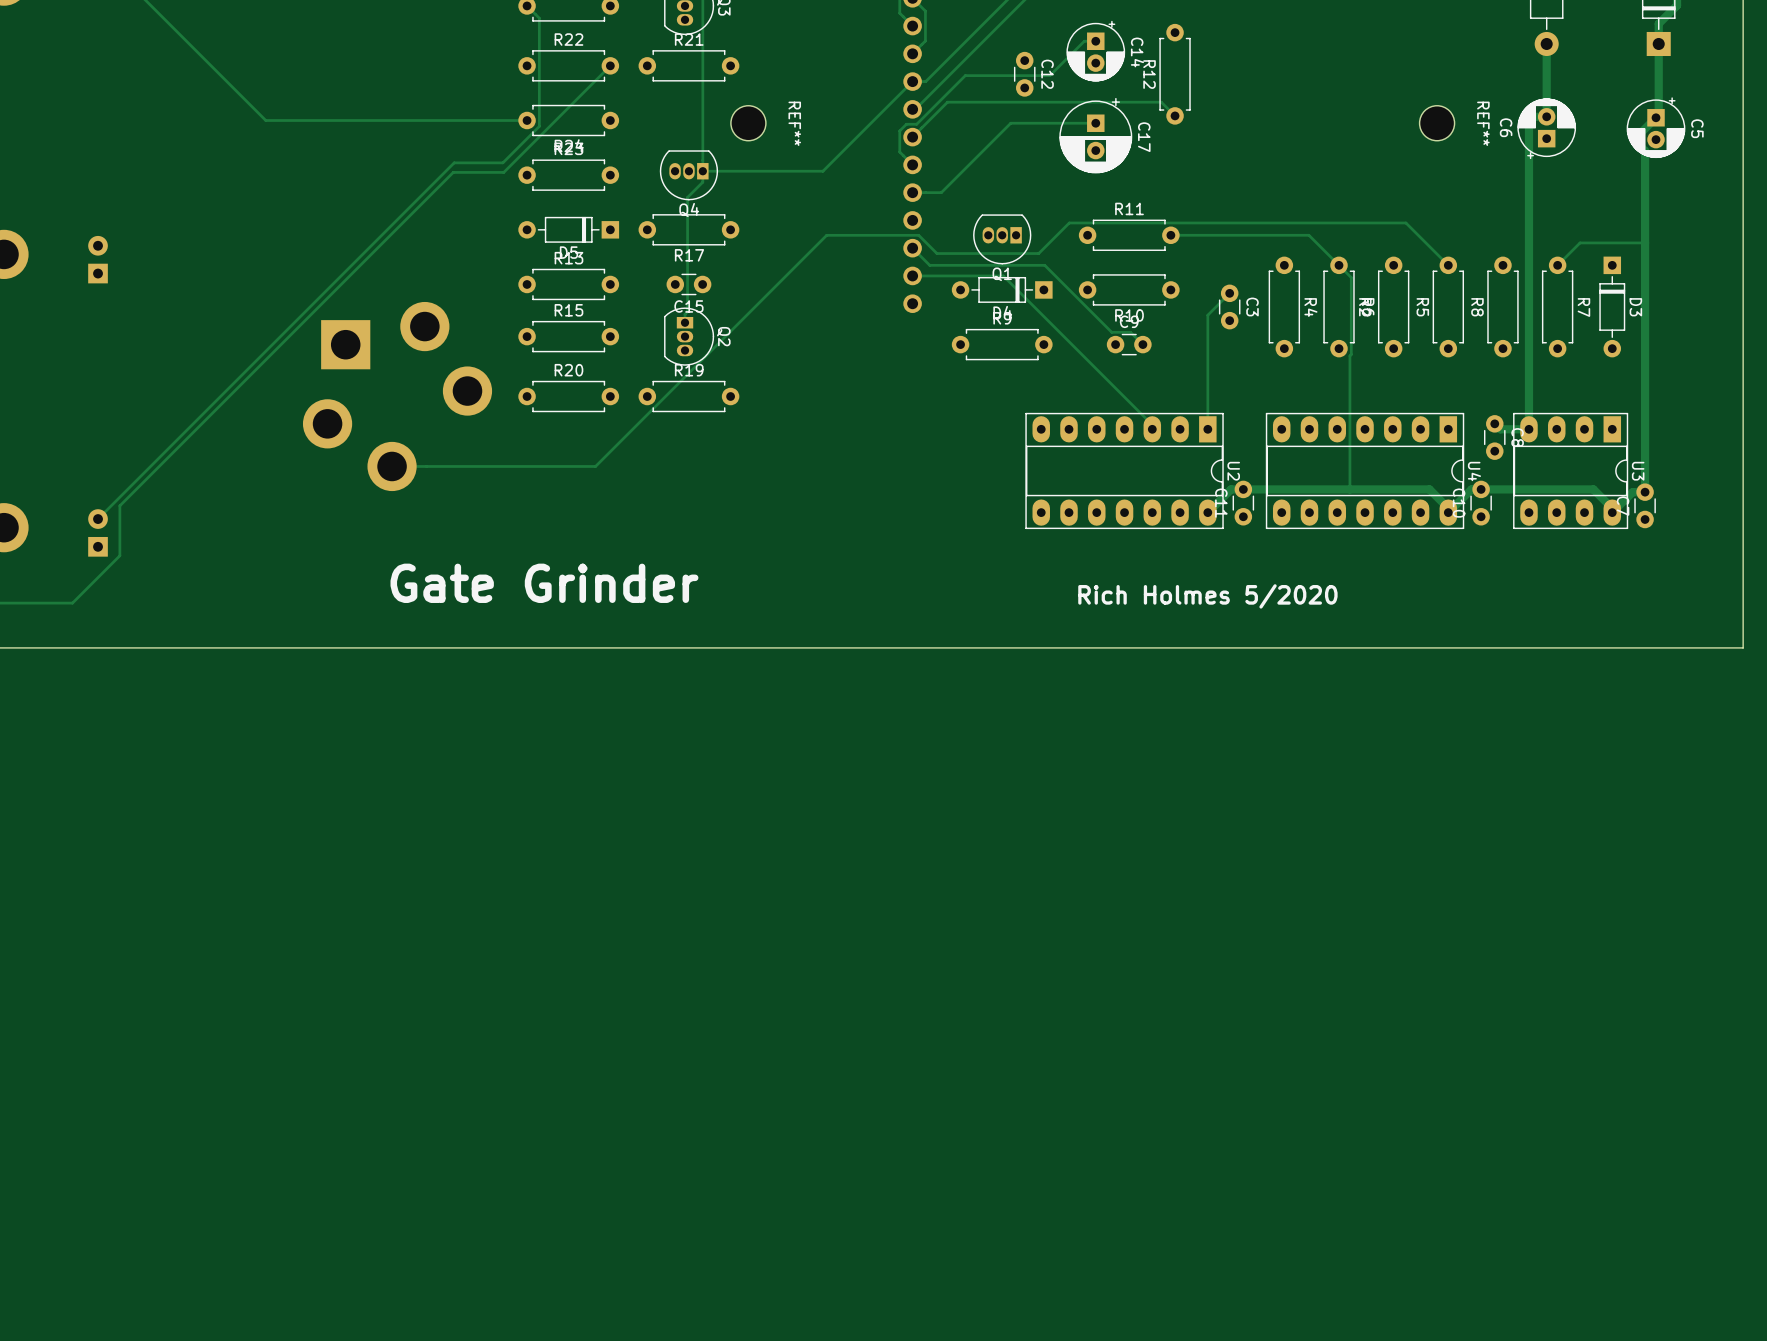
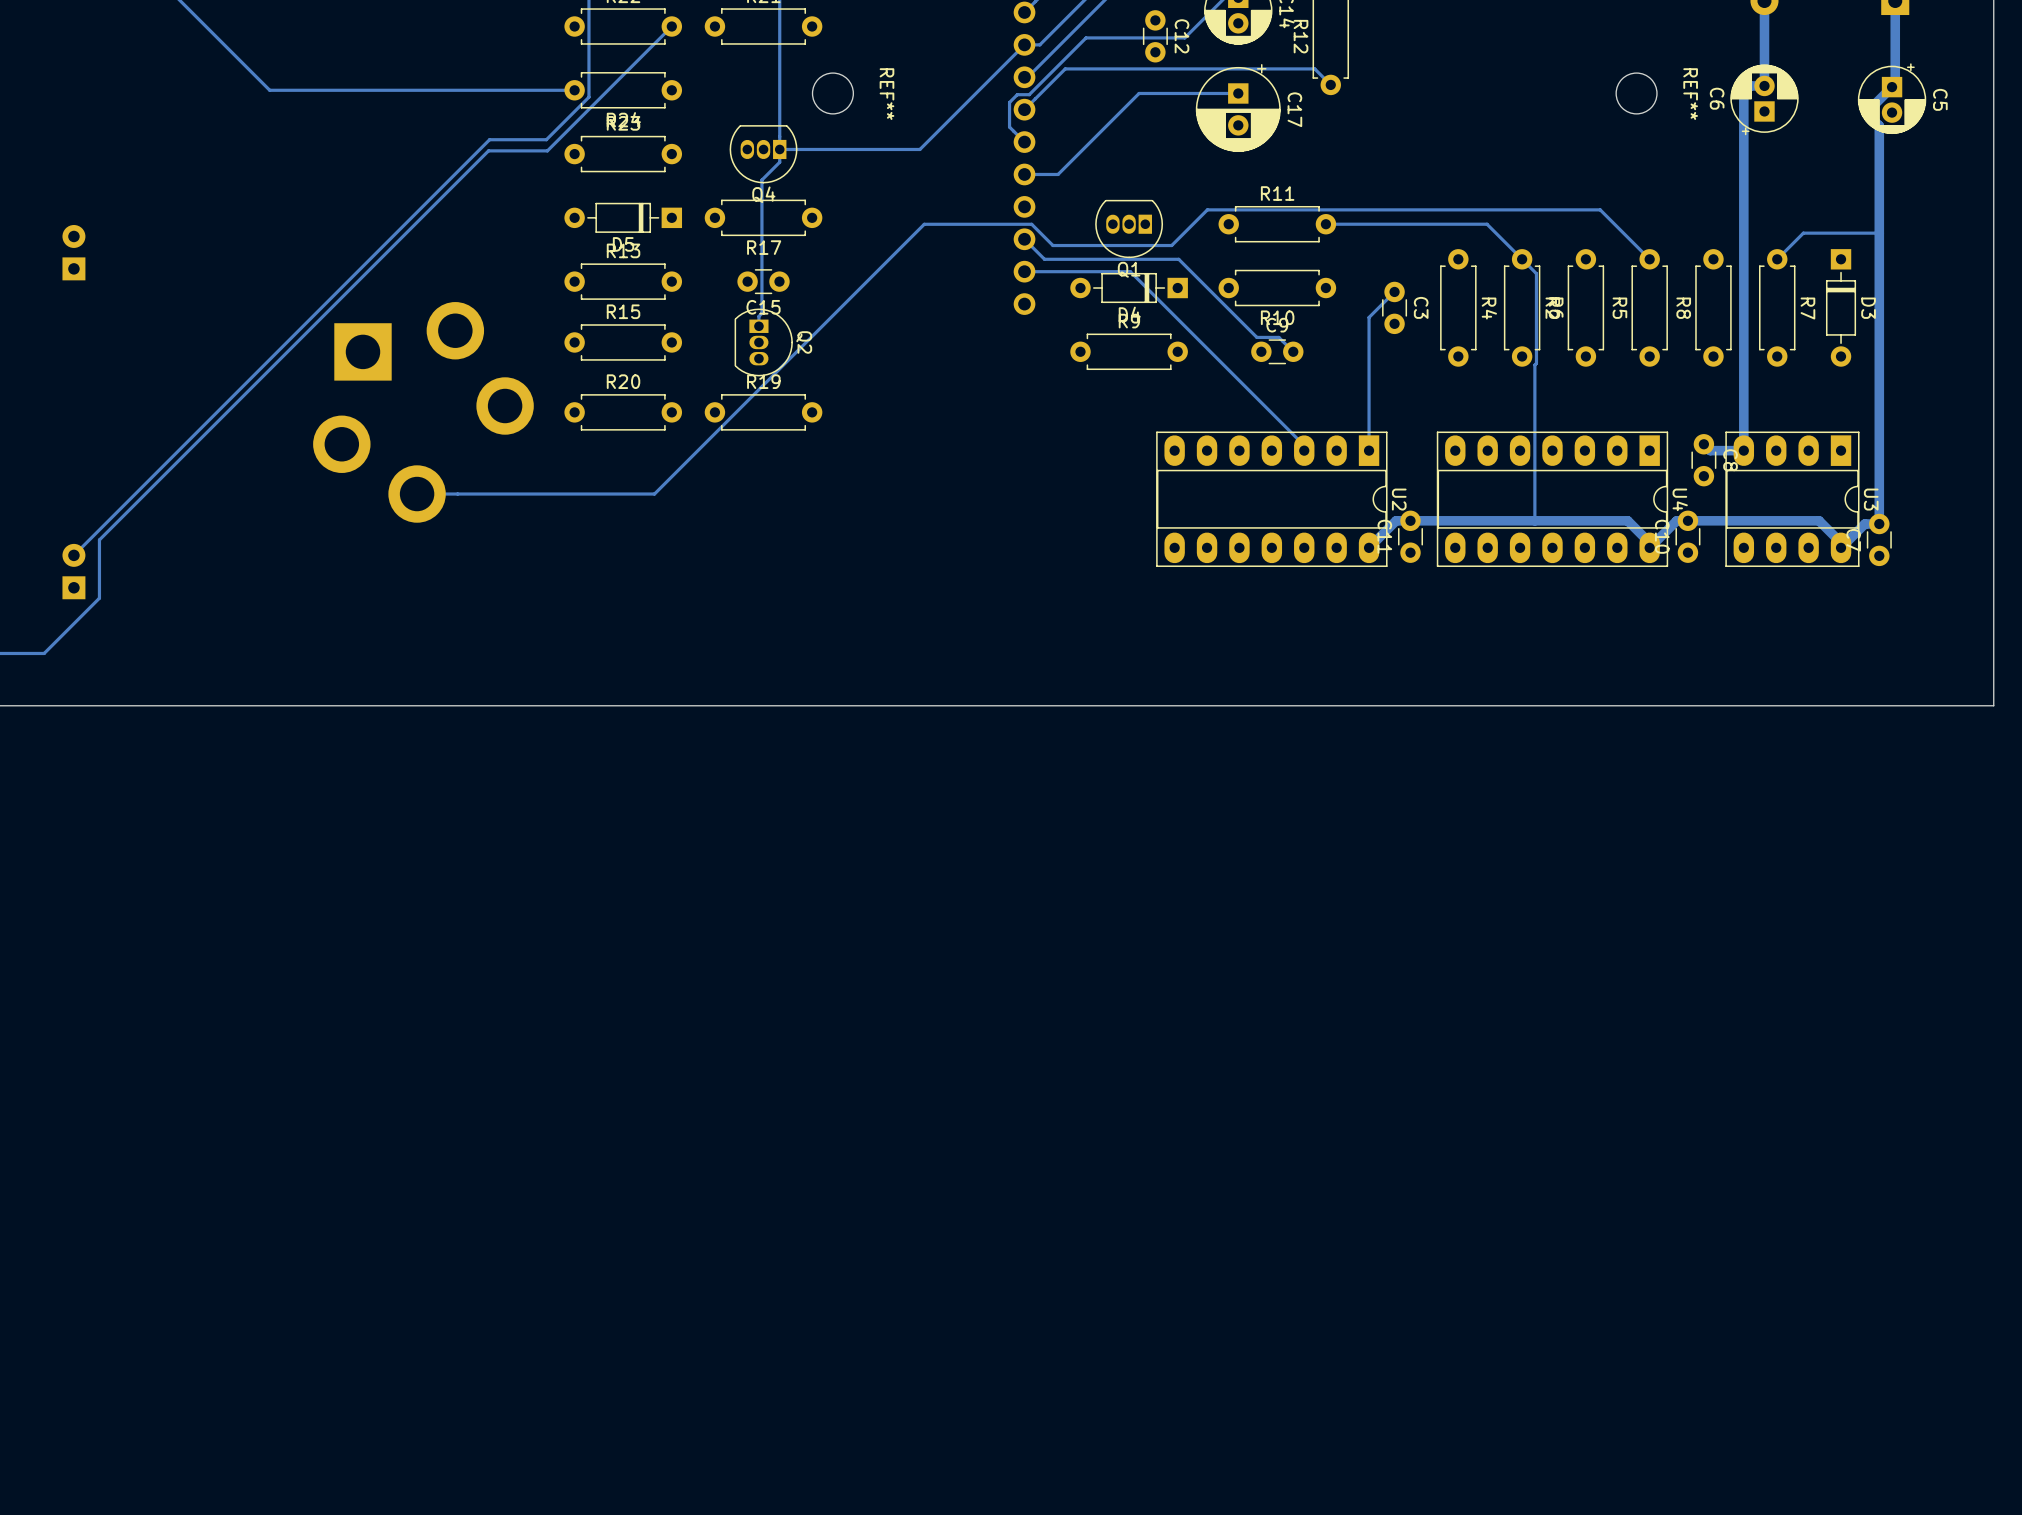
text: Gate Grinder (544, 583) -> none
text: Rich Holmes 5/2020 (1207, 596) -> none

